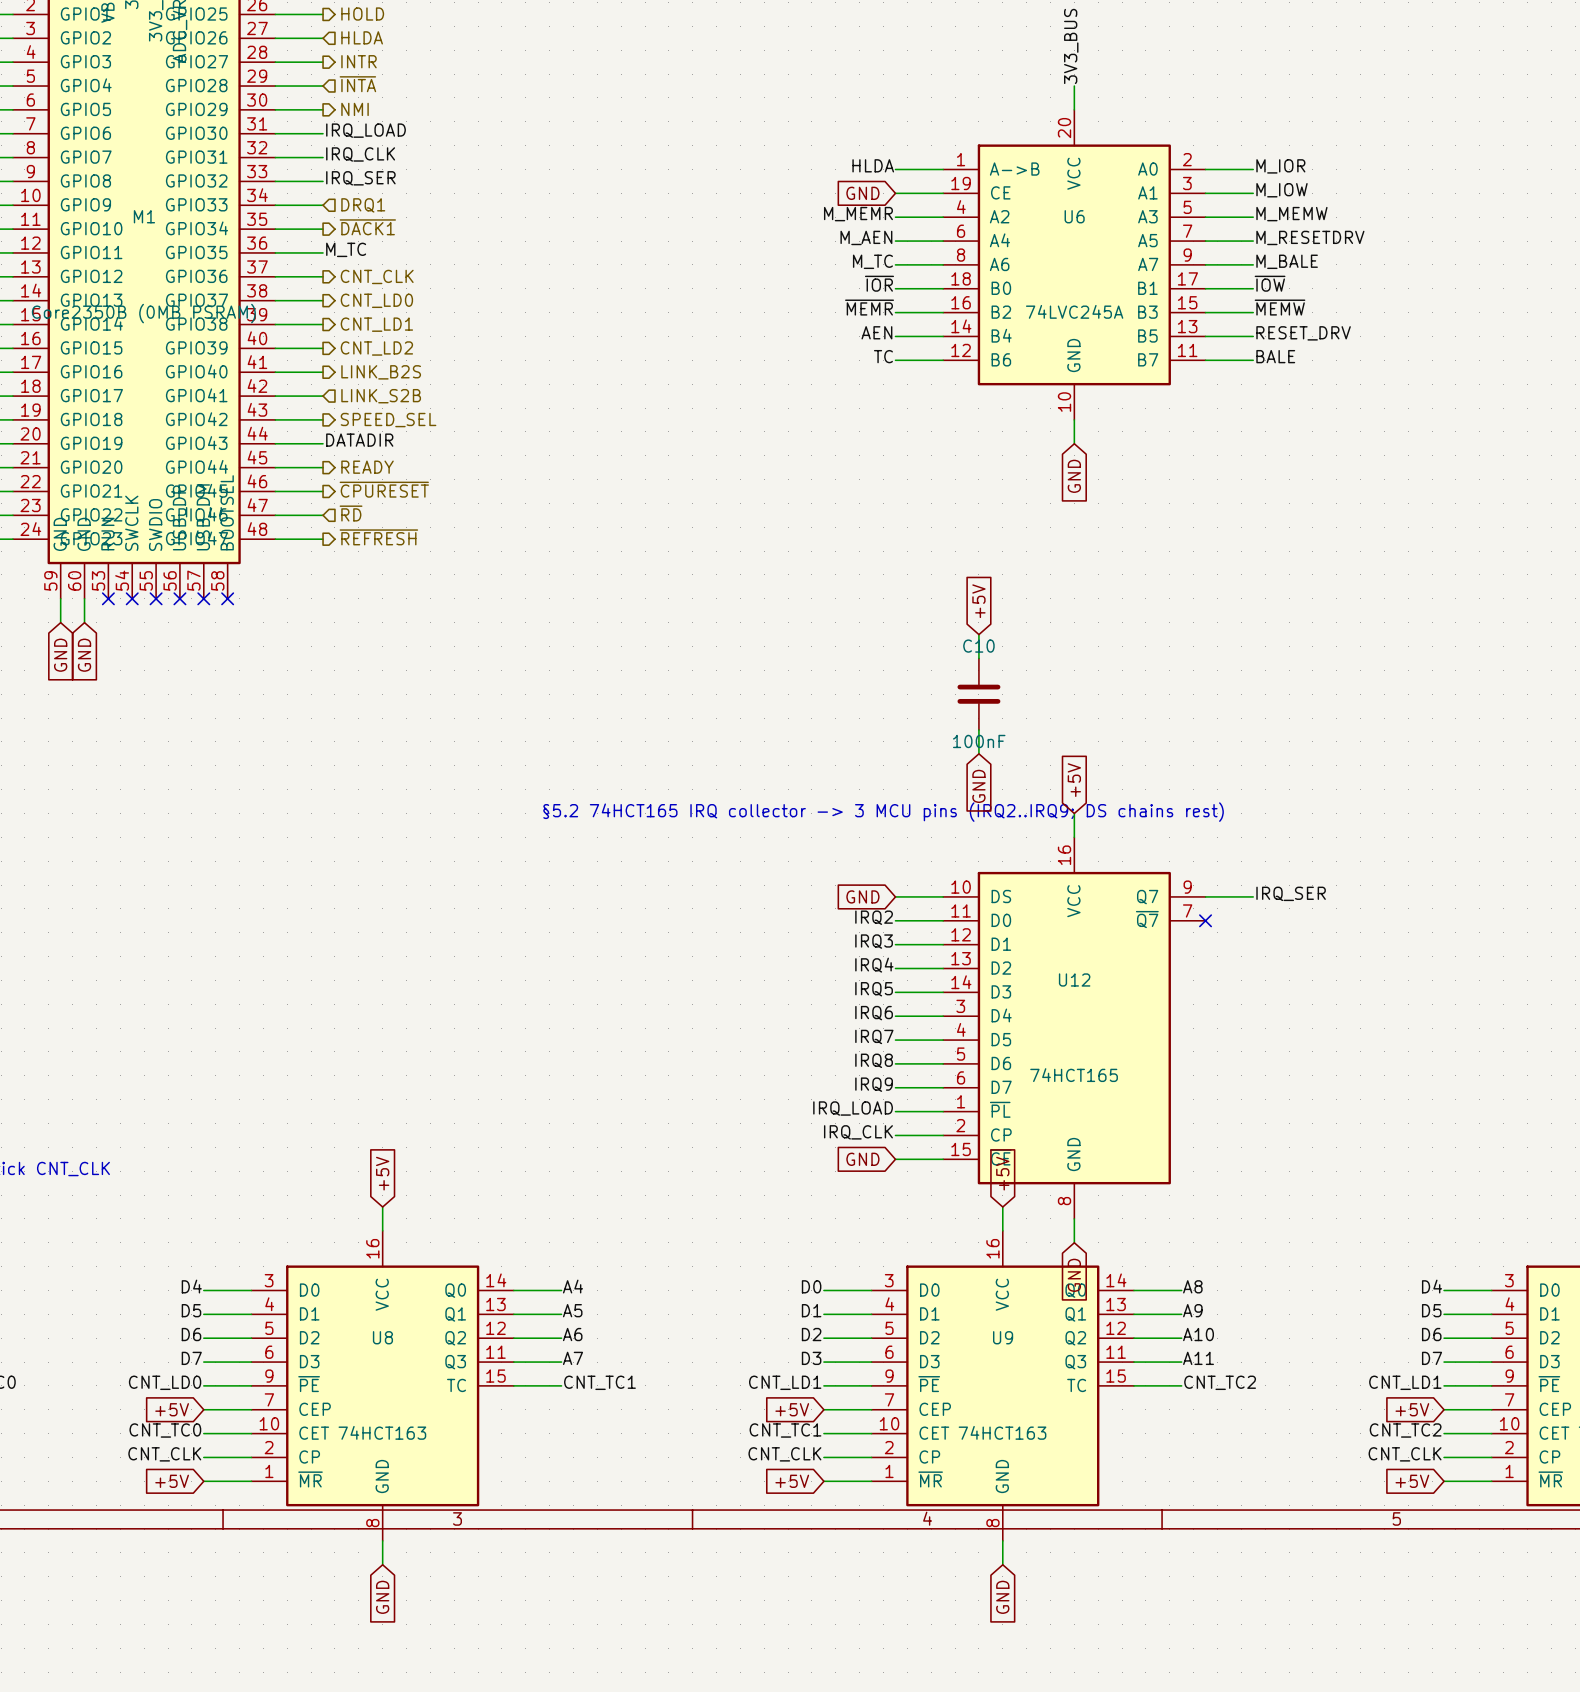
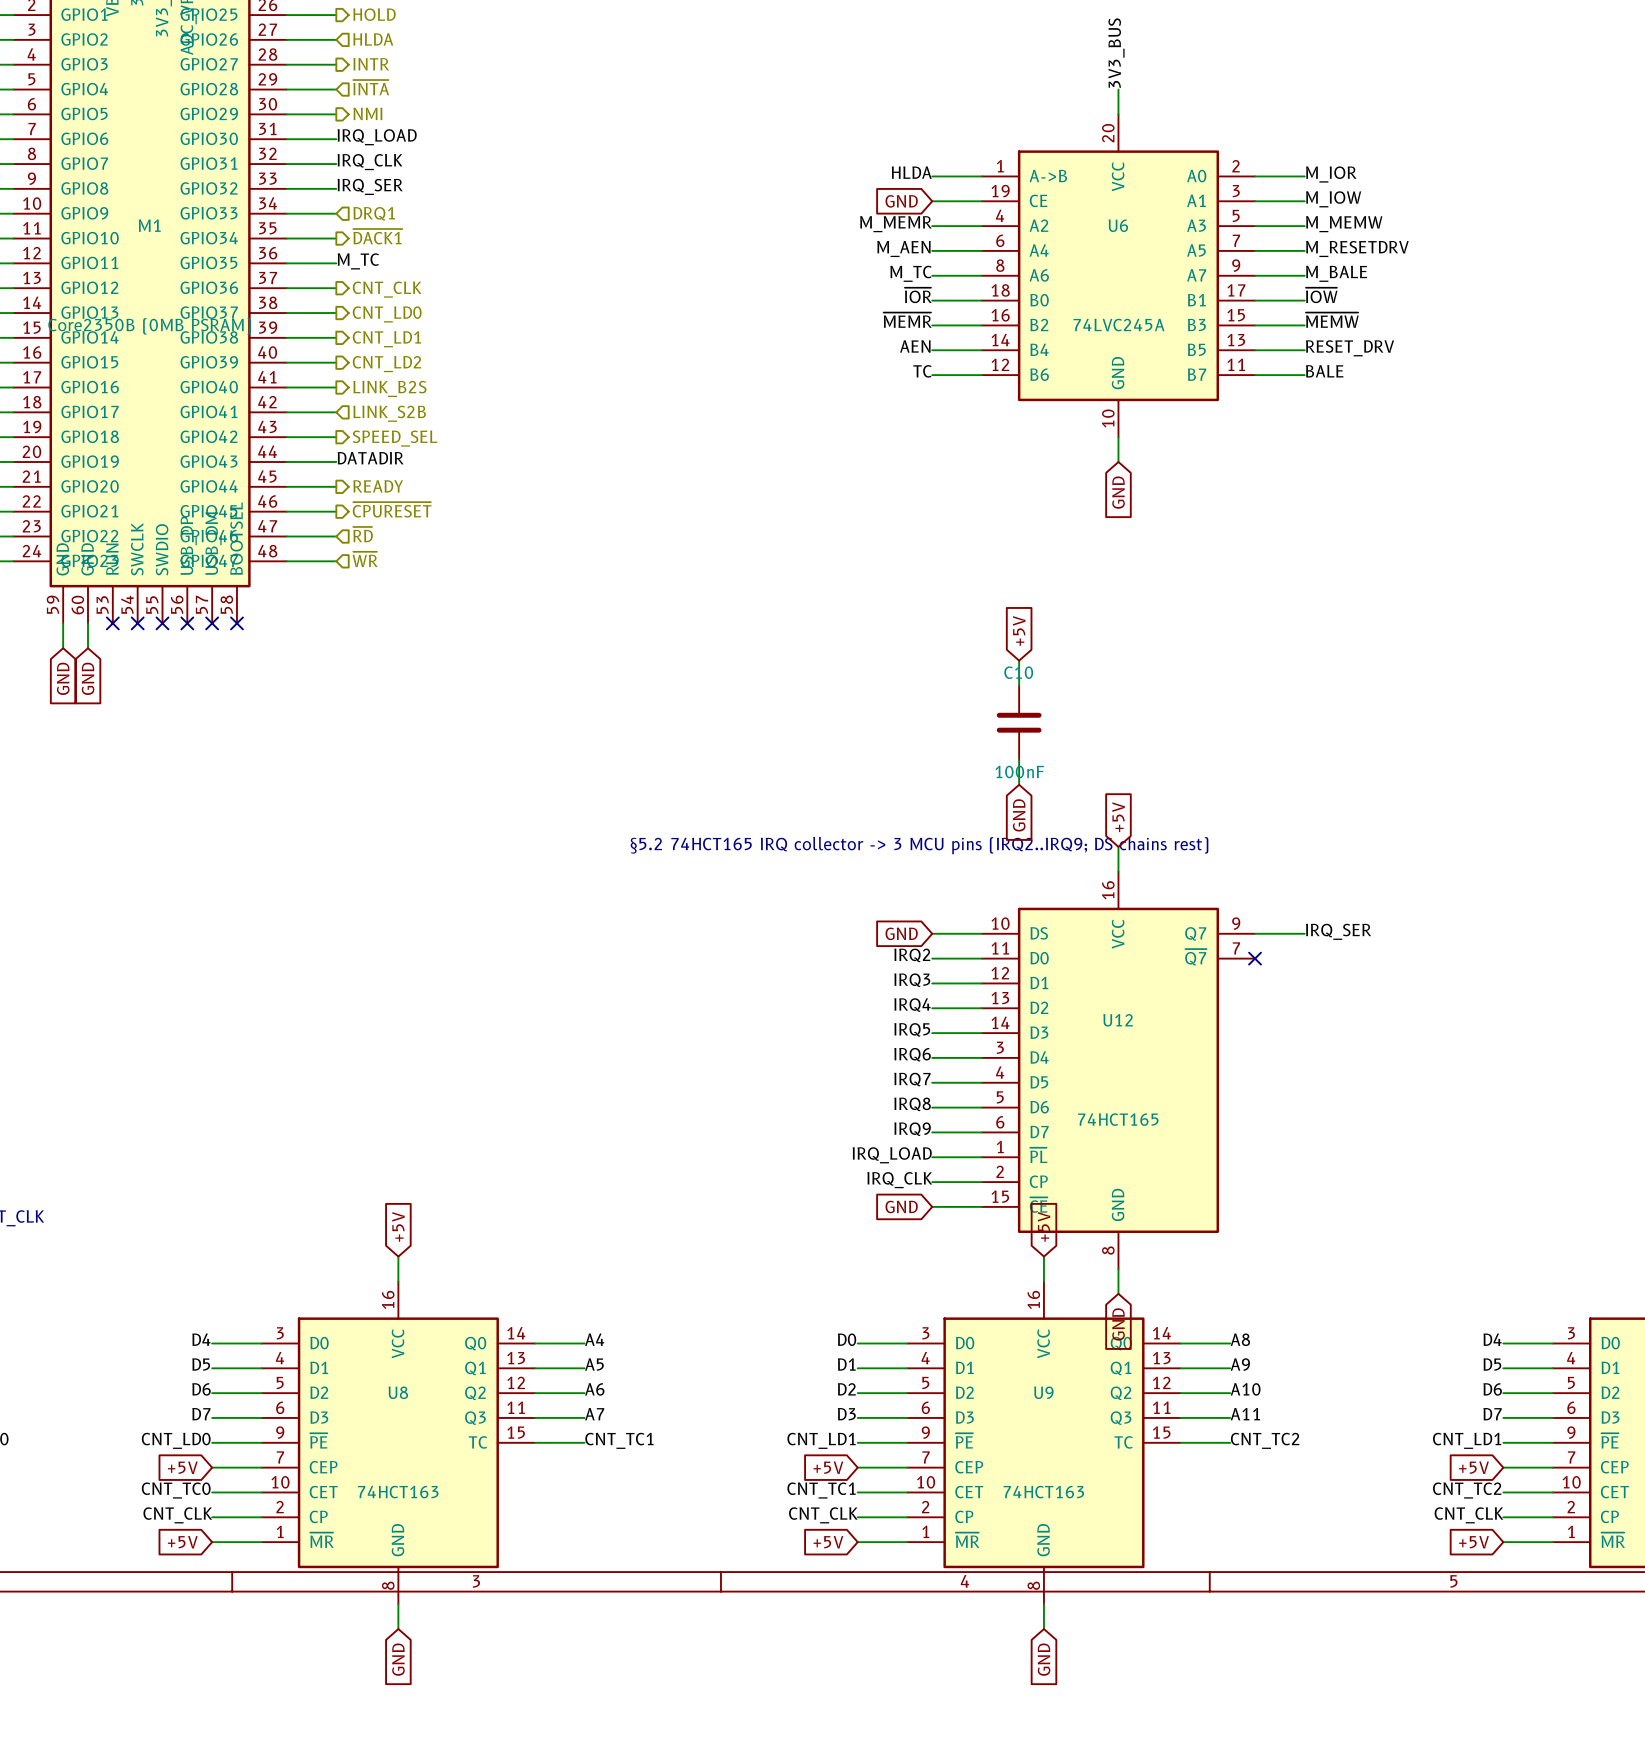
hierarchical label shape: output (378, 537) -> input (365, 559)
hierarchical label: ~{REFRESH} (378, 537) -> ~{WR} (365, 559)

